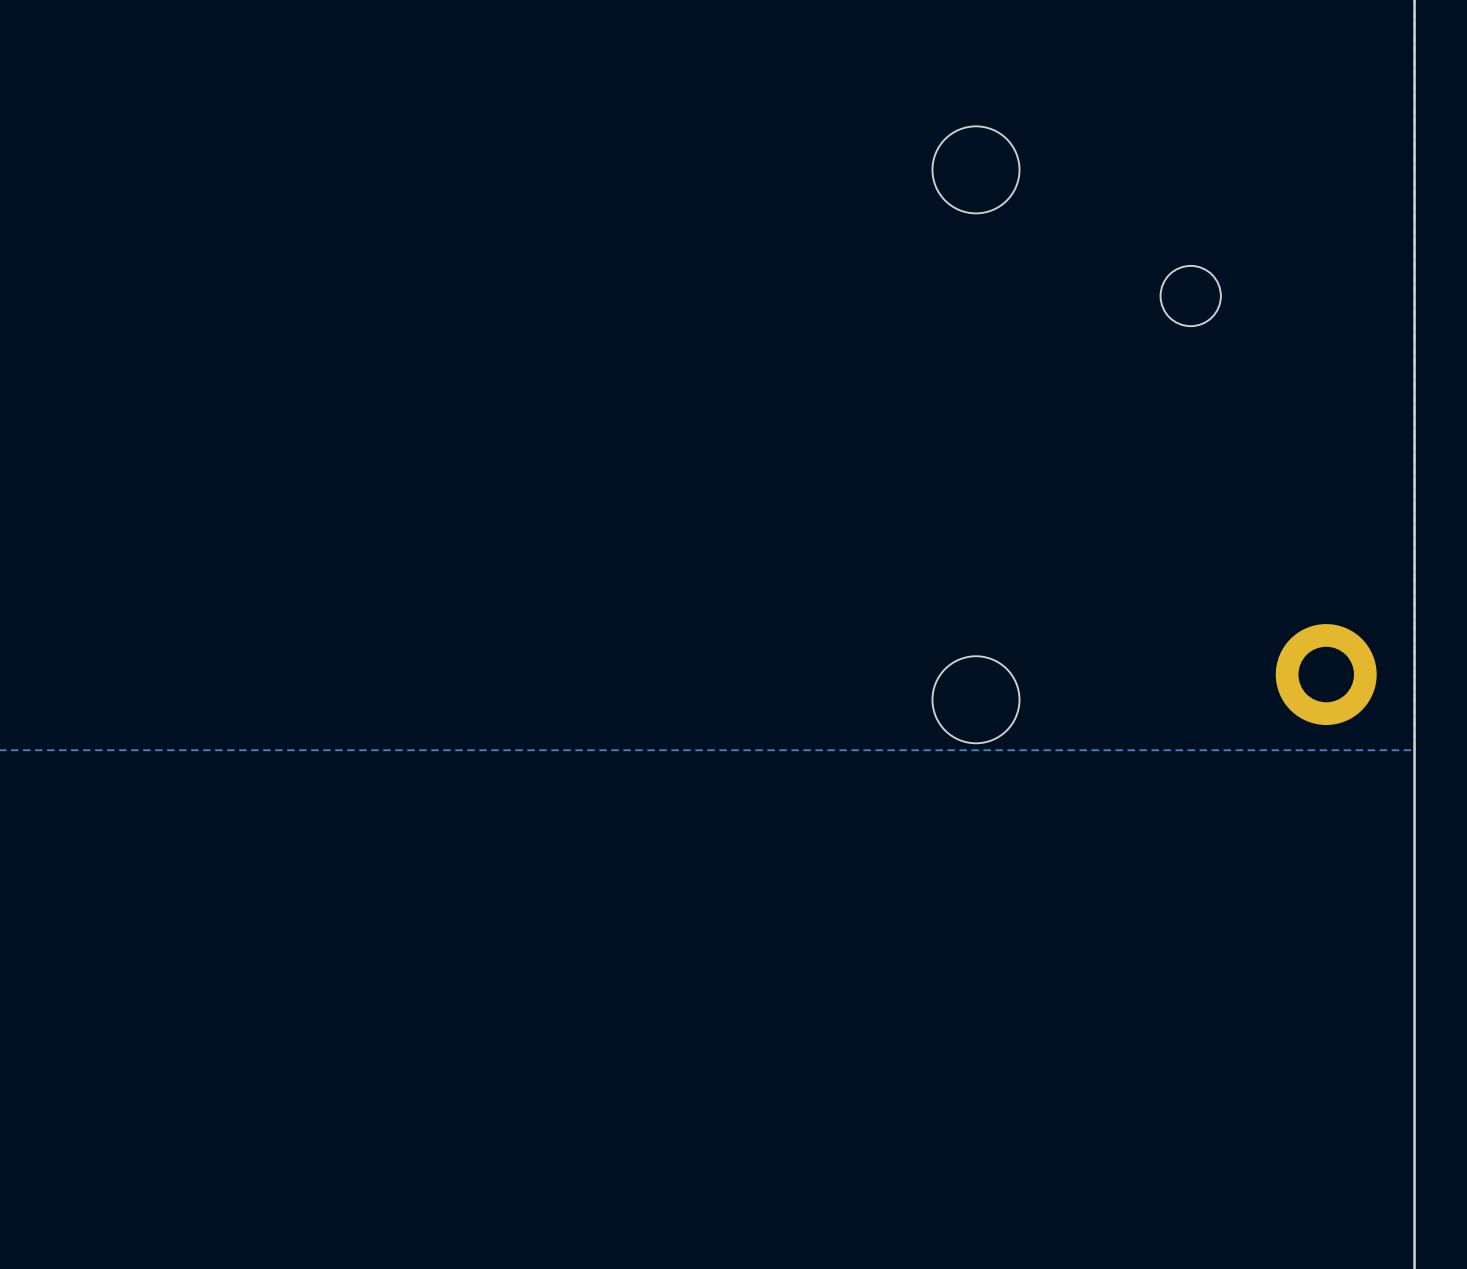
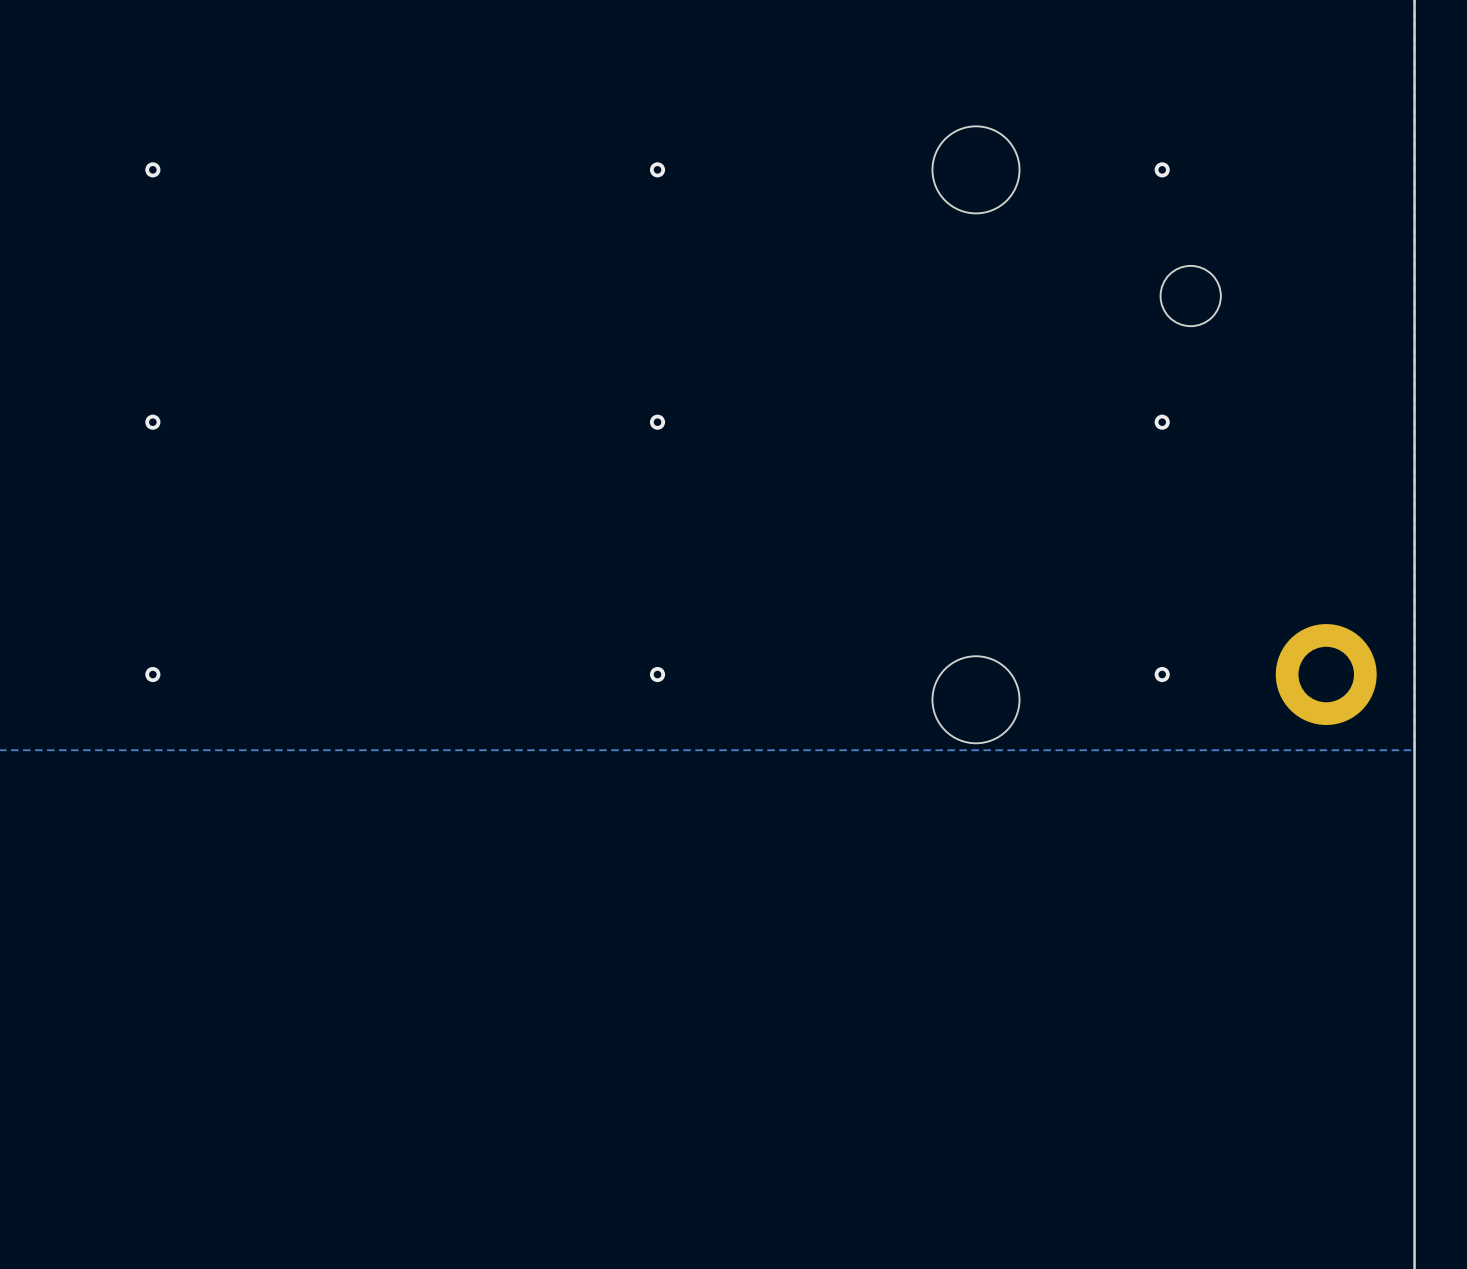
via: none -> (152, 169)
via: none -> (657, 169)
via: none -> (1162, 169)
via: none -> (152, 422)
via: none -> (657, 422)
via: none -> (1162, 422)
via: none -> (152, 674)
via: none -> (657, 674)
via: none -> (1162, 674)

